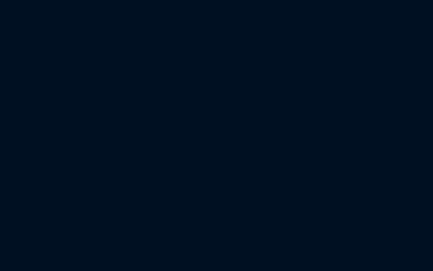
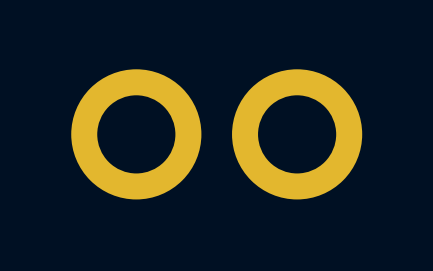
part: none -> (136, 134)
part: none -> (297, 134)

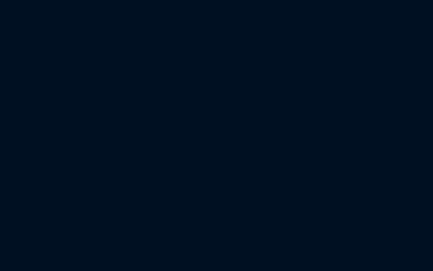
part: (136, 134) -> none
part: (297, 134) -> none

